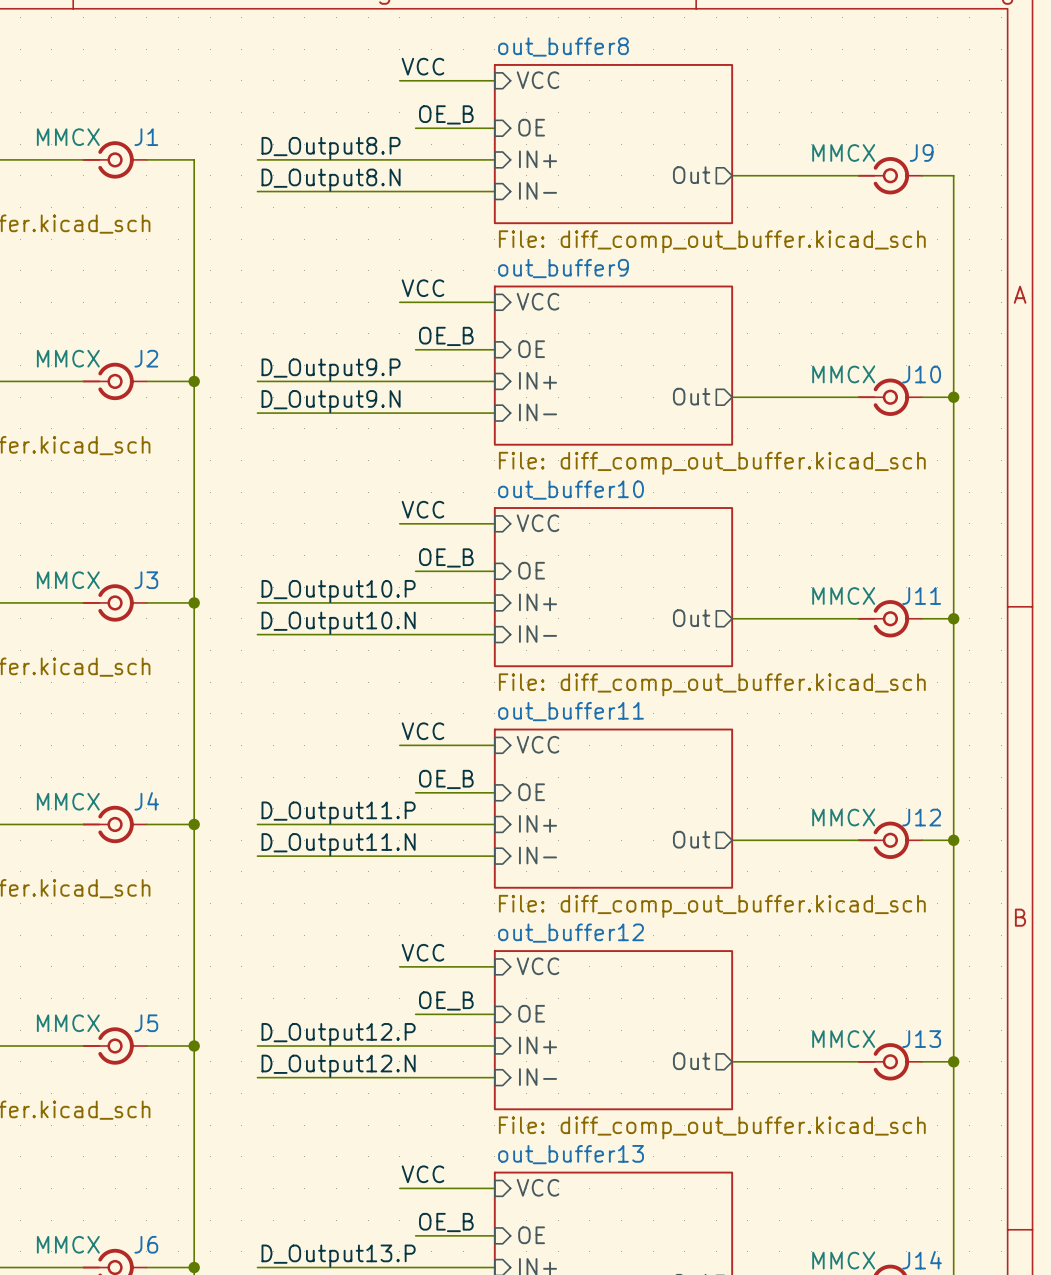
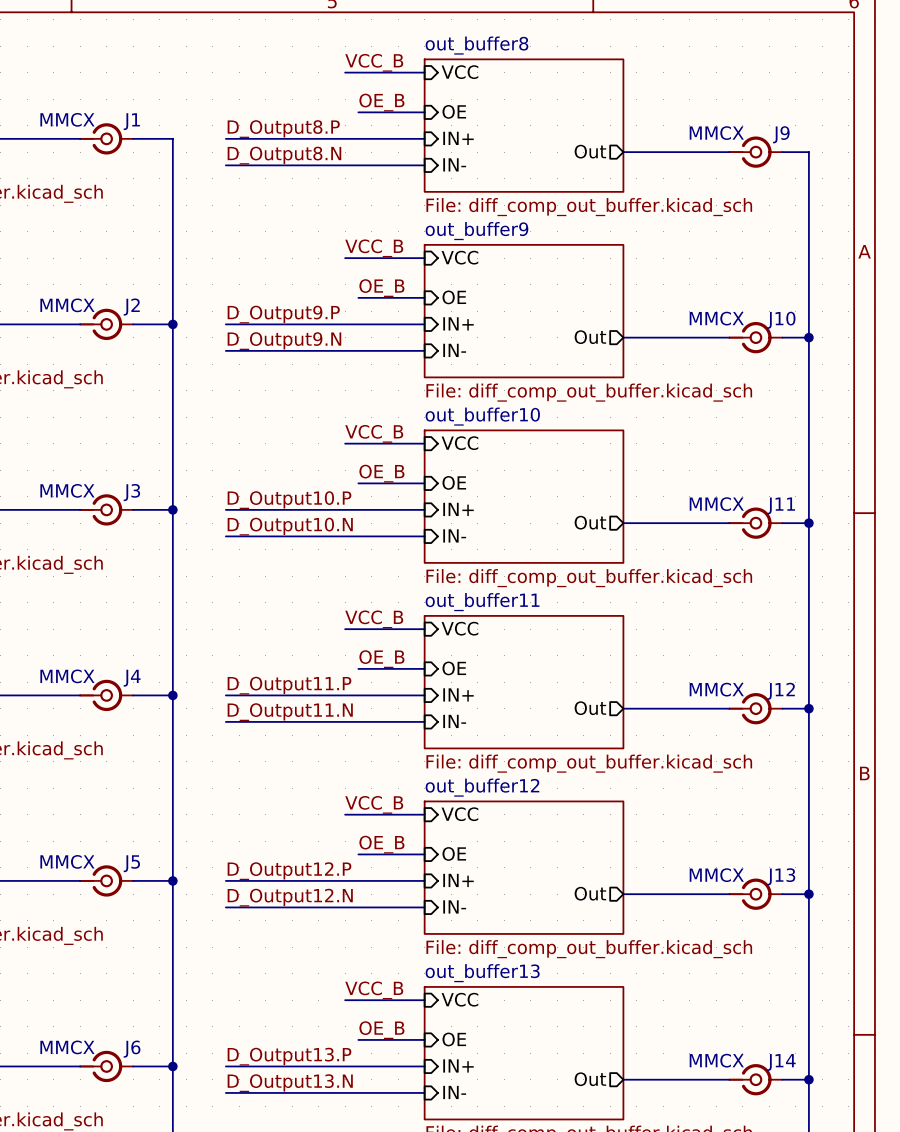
label: VCC (422, 66) -> VCC_B (374, 62)
label: VCC (422, 288) -> VCC_B (374, 248)
label: VCC (422, 509) -> VCC_B (374, 433)
label: VCC (422, 731) -> VCC_B (374, 619)
label: VCC (422, 952) -> VCC_B (374, 804)
label: VCC (422, 1174) -> VCC_B (374, 990)

